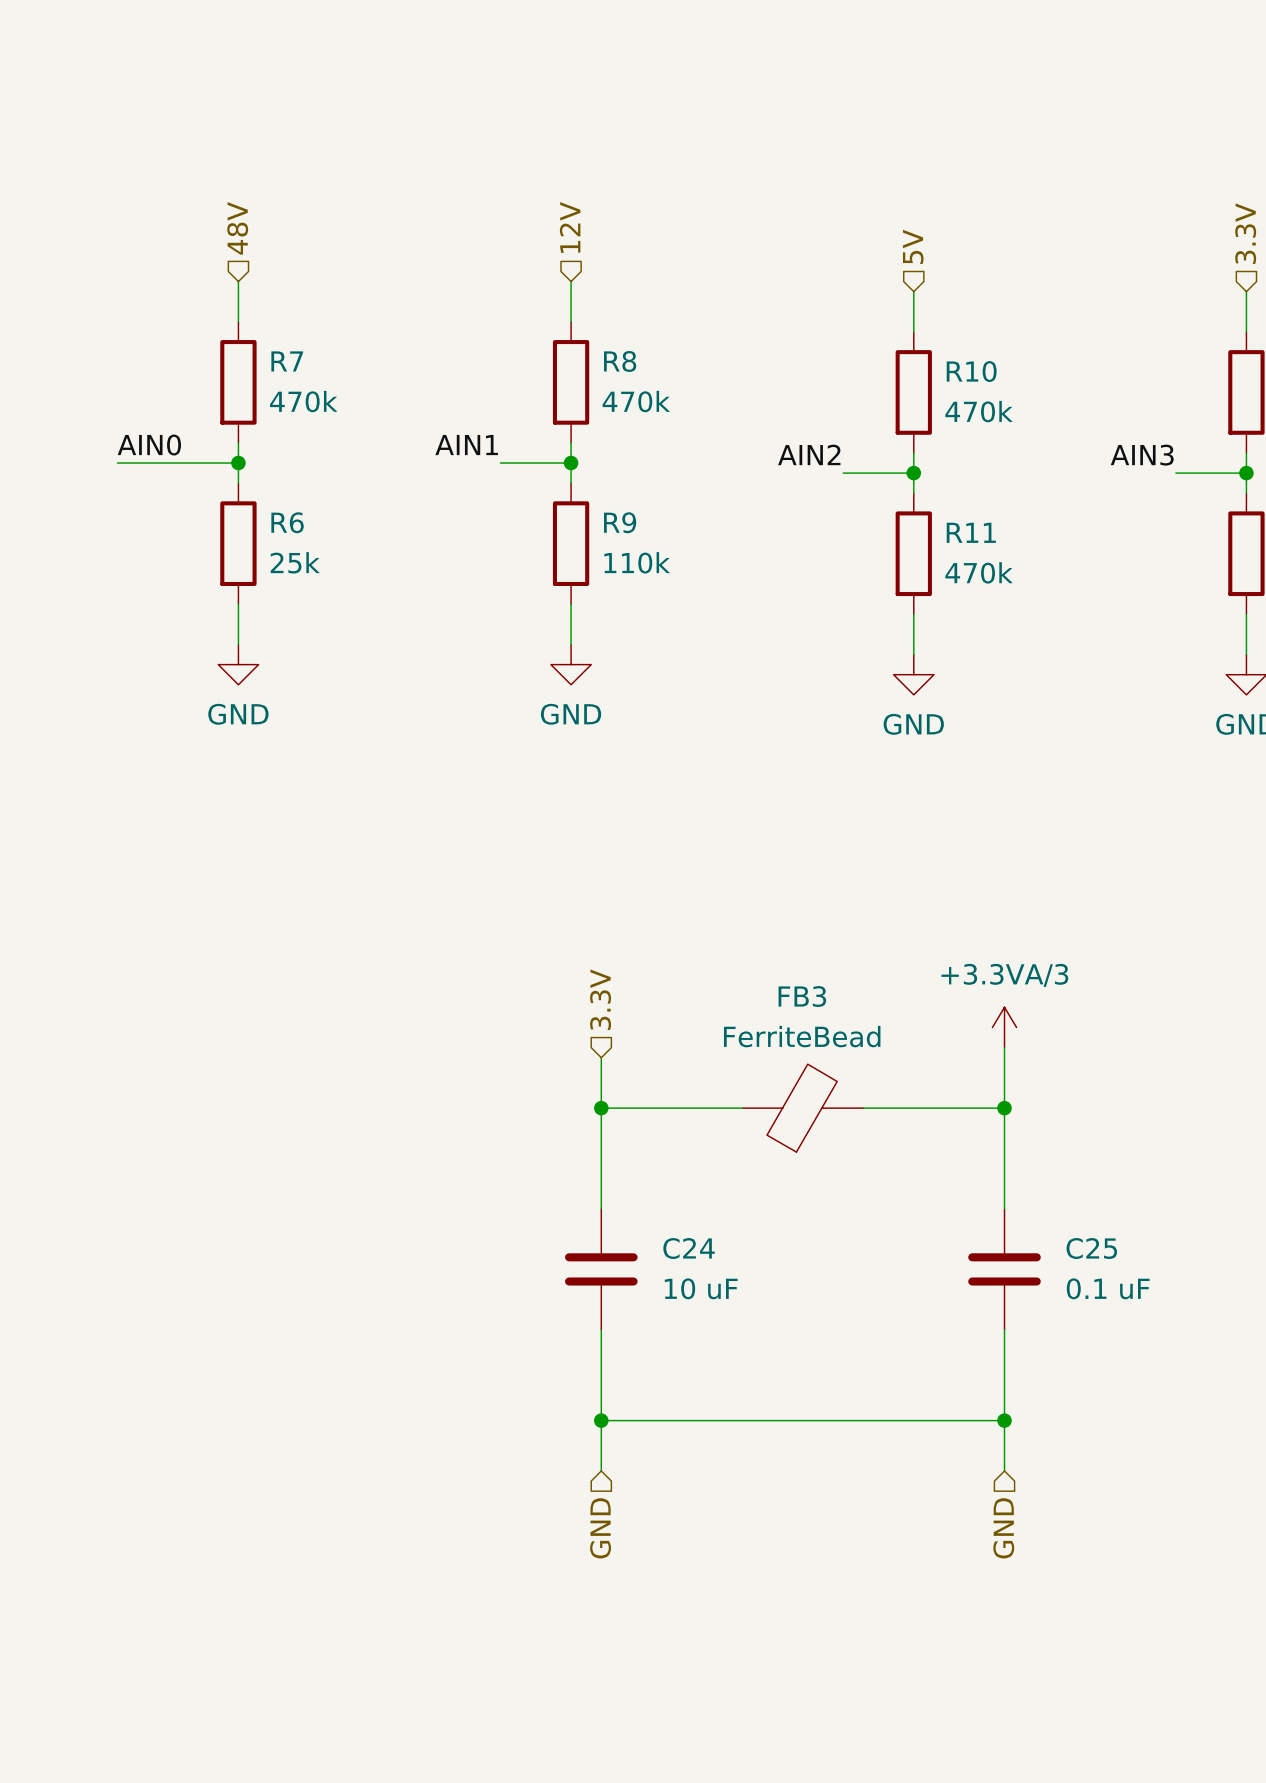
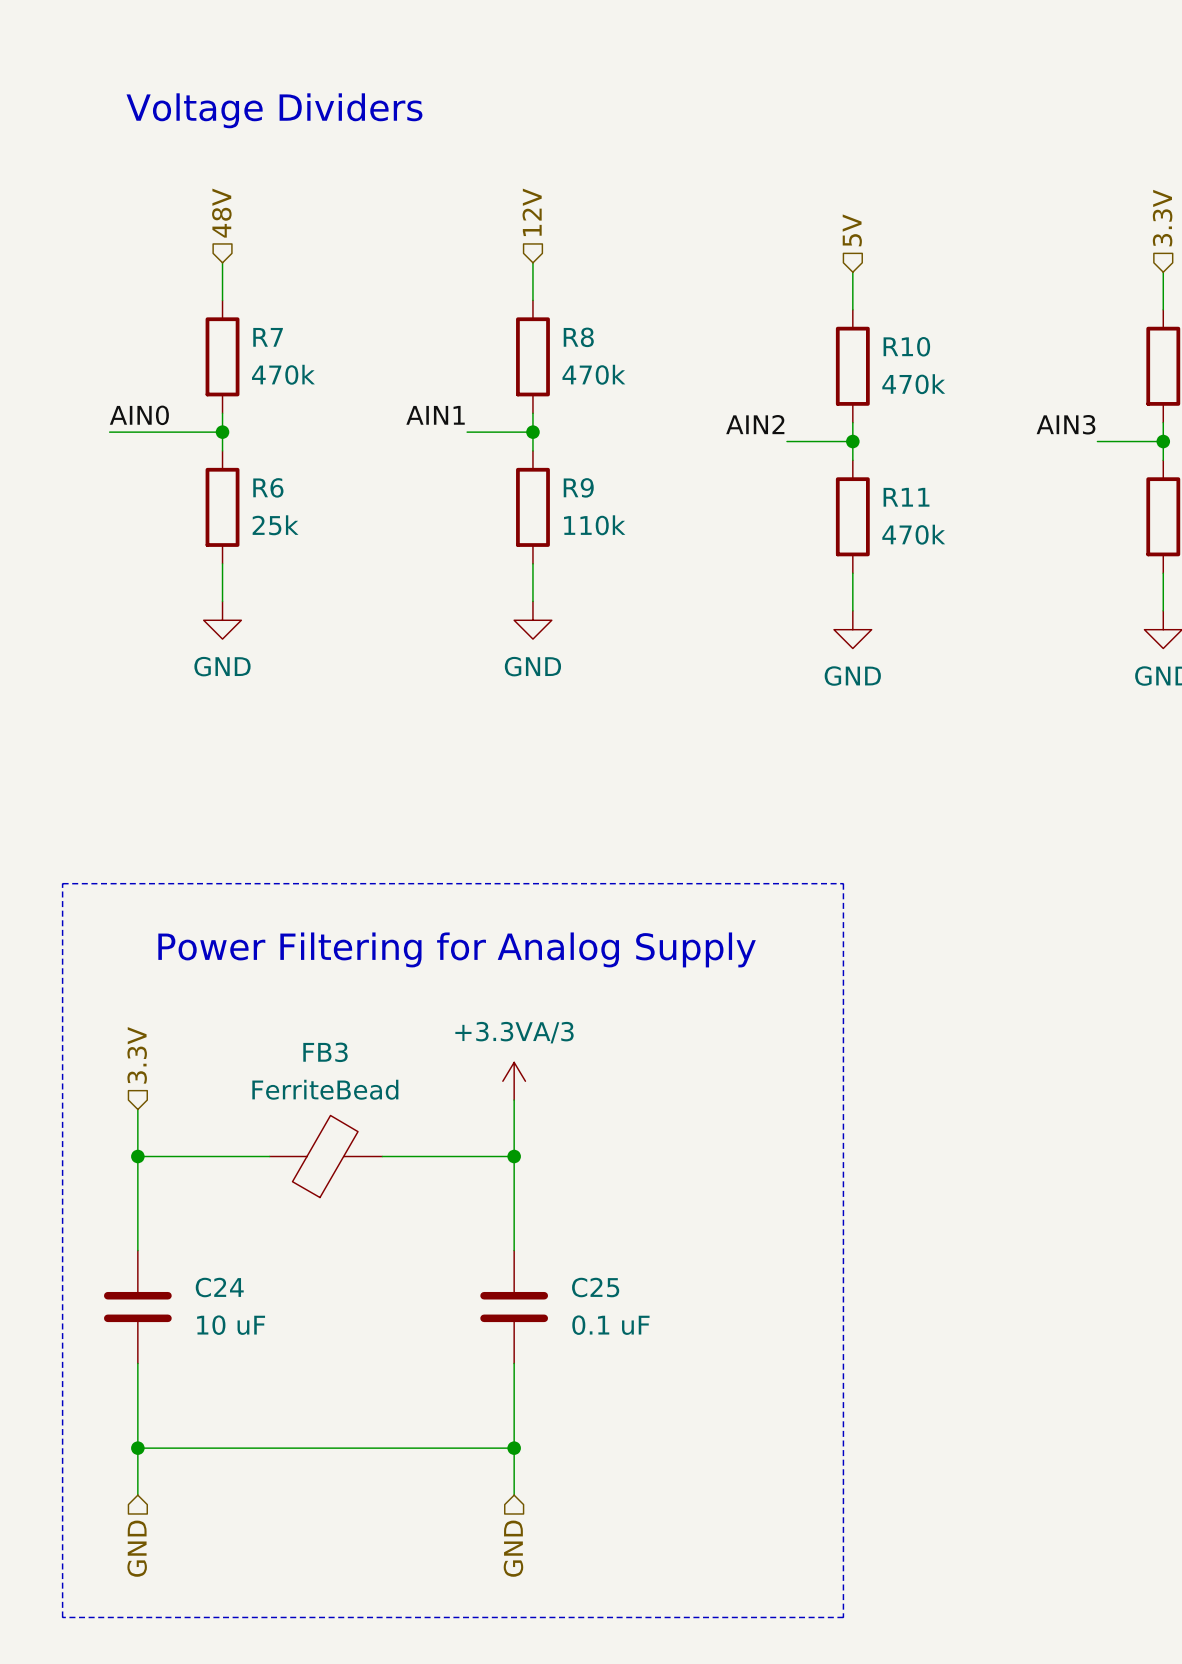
text: none -> Voltage Dividers (274, 110)
line: none -> (62, 883) (843, 883) (843, 1617) (62, 1617) (62, 883)
hierarchical label: 3.3V (600, 999) -> none
text: none -> Power Filtering for Analog Supply (457, 949)
power symbol: +3.3VA/3 (1004, 1027) -> none
wire: (1004, 1047) (1004, 1208) -> none
wire: (601, 1057) (601, 1208) -> none
wire: (601, 1108) (742, 1108) -> (382, 1156) (514, 1156)
junction: (601, 1108) -> none
FB3 position: (802, 1108) -> (326, 1156)
wire: (863, 1108) (1004, 1108) -> none
junction: (1004, 1108) -> none
hierarchical label: none -> 3.3V (137, 1055)
power symbol: none -> +3.3VA/3 (514, 1081)
wire: none -> (514, 1100) (514, 1250)
wire: none -> (137, 1109) (137, 1250)
wire: none -> (137, 1156) (269, 1156)
junction: none -> (137, 1156)
junction: none -> (514, 1156)
C24 position: (601, 1269) -> (137, 1307)
C25 position: (1004, 1269) -> (514, 1307)
wire: (601, 1329) (601, 1471) -> (514, 1363) (514, 1495)
wire: (1004, 1329) (1004, 1471) -> none
wire: (601, 1420) (1004, 1420) -> none
junction: (601, 1420) -> none
junction: (1004, 1420) -> none
wire: none -> (137, 1363) (137, 1495)
hierarchical label position: GND (600, 1528) -> GND (513, 1548)
hierarchical label: GND (1003, 1528) -> none
wire: none -> (137, 1448) (514, 1448)
junction: none -> (137, 1448)
junction: none -> (514, 1448)
hierarchical label: none -> GND (137, 1548)

